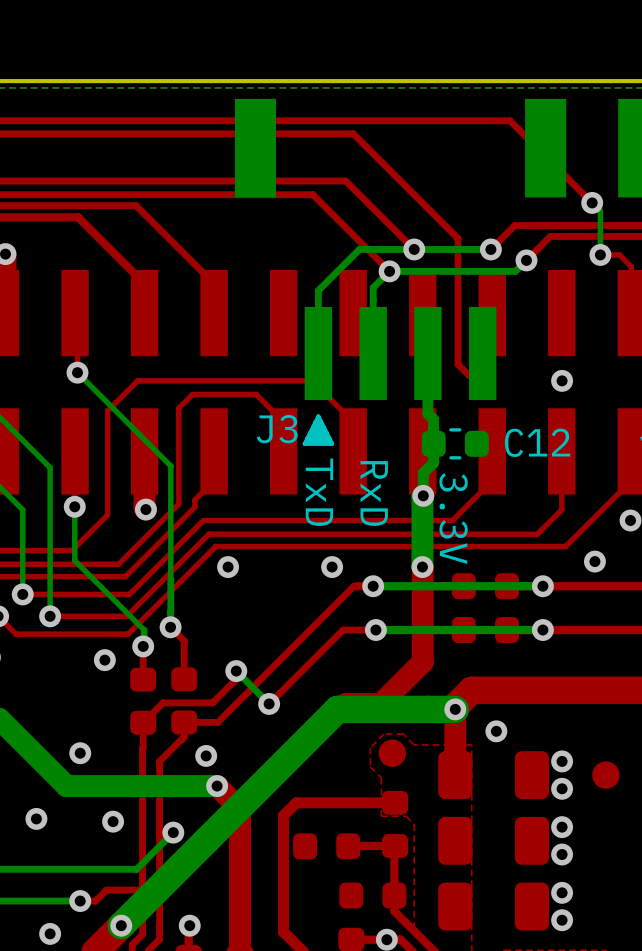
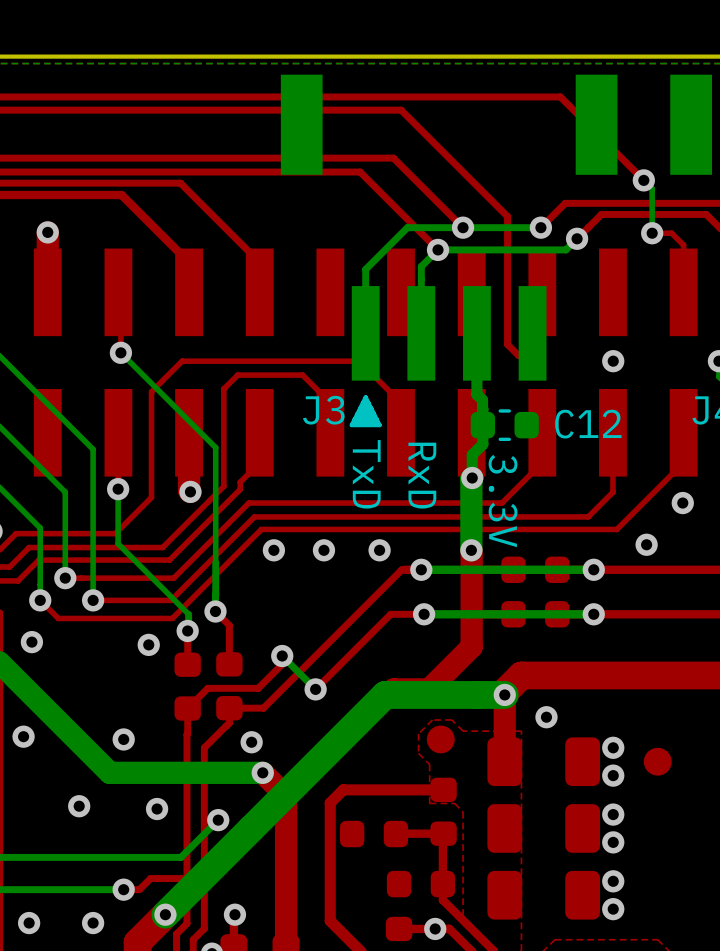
via: none -> (323, 550)

